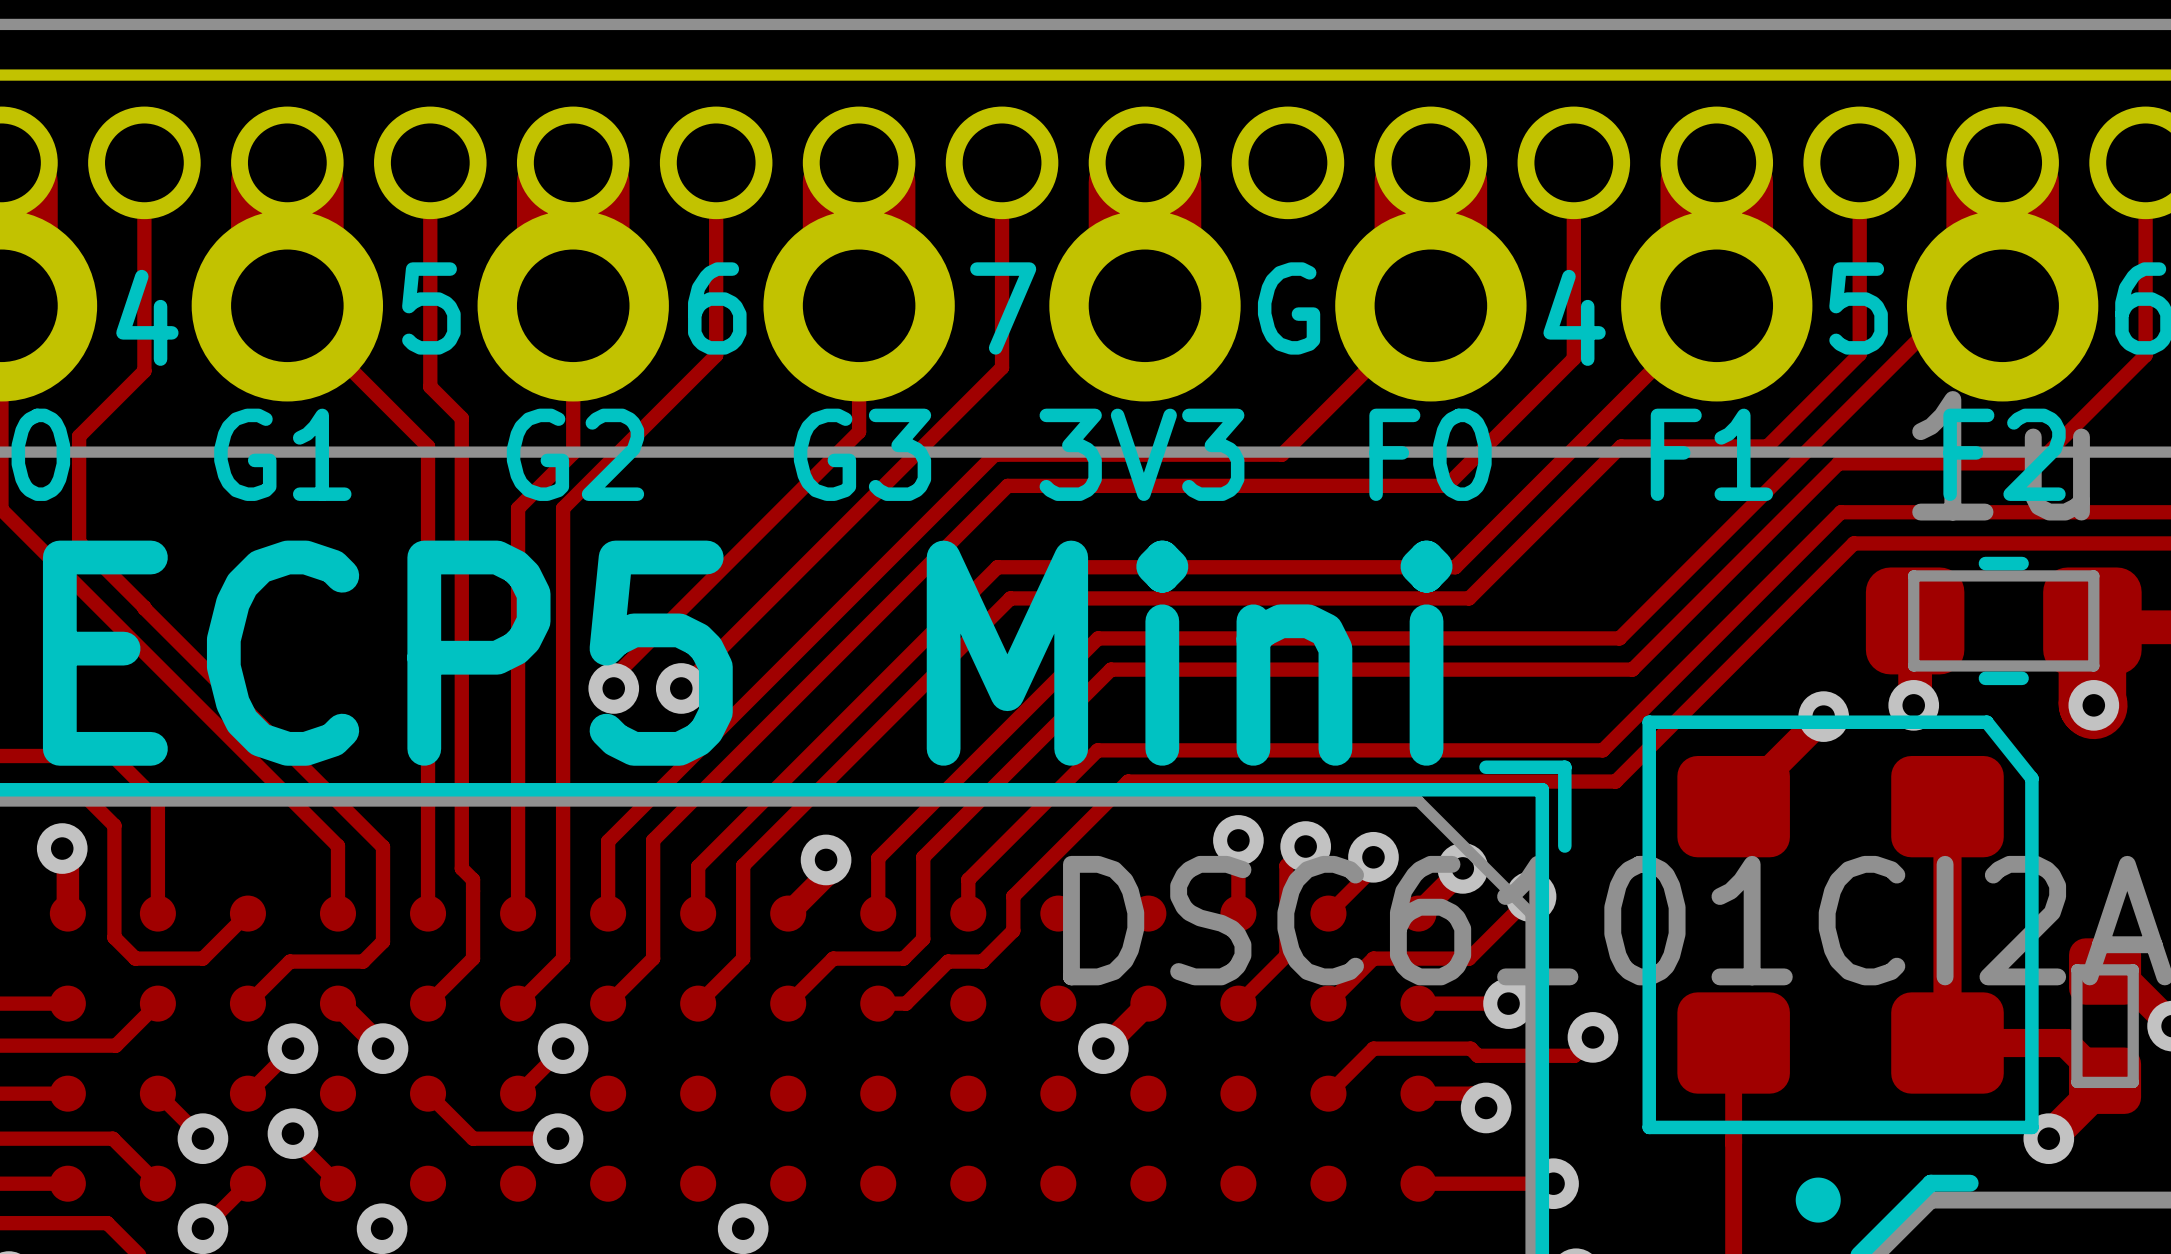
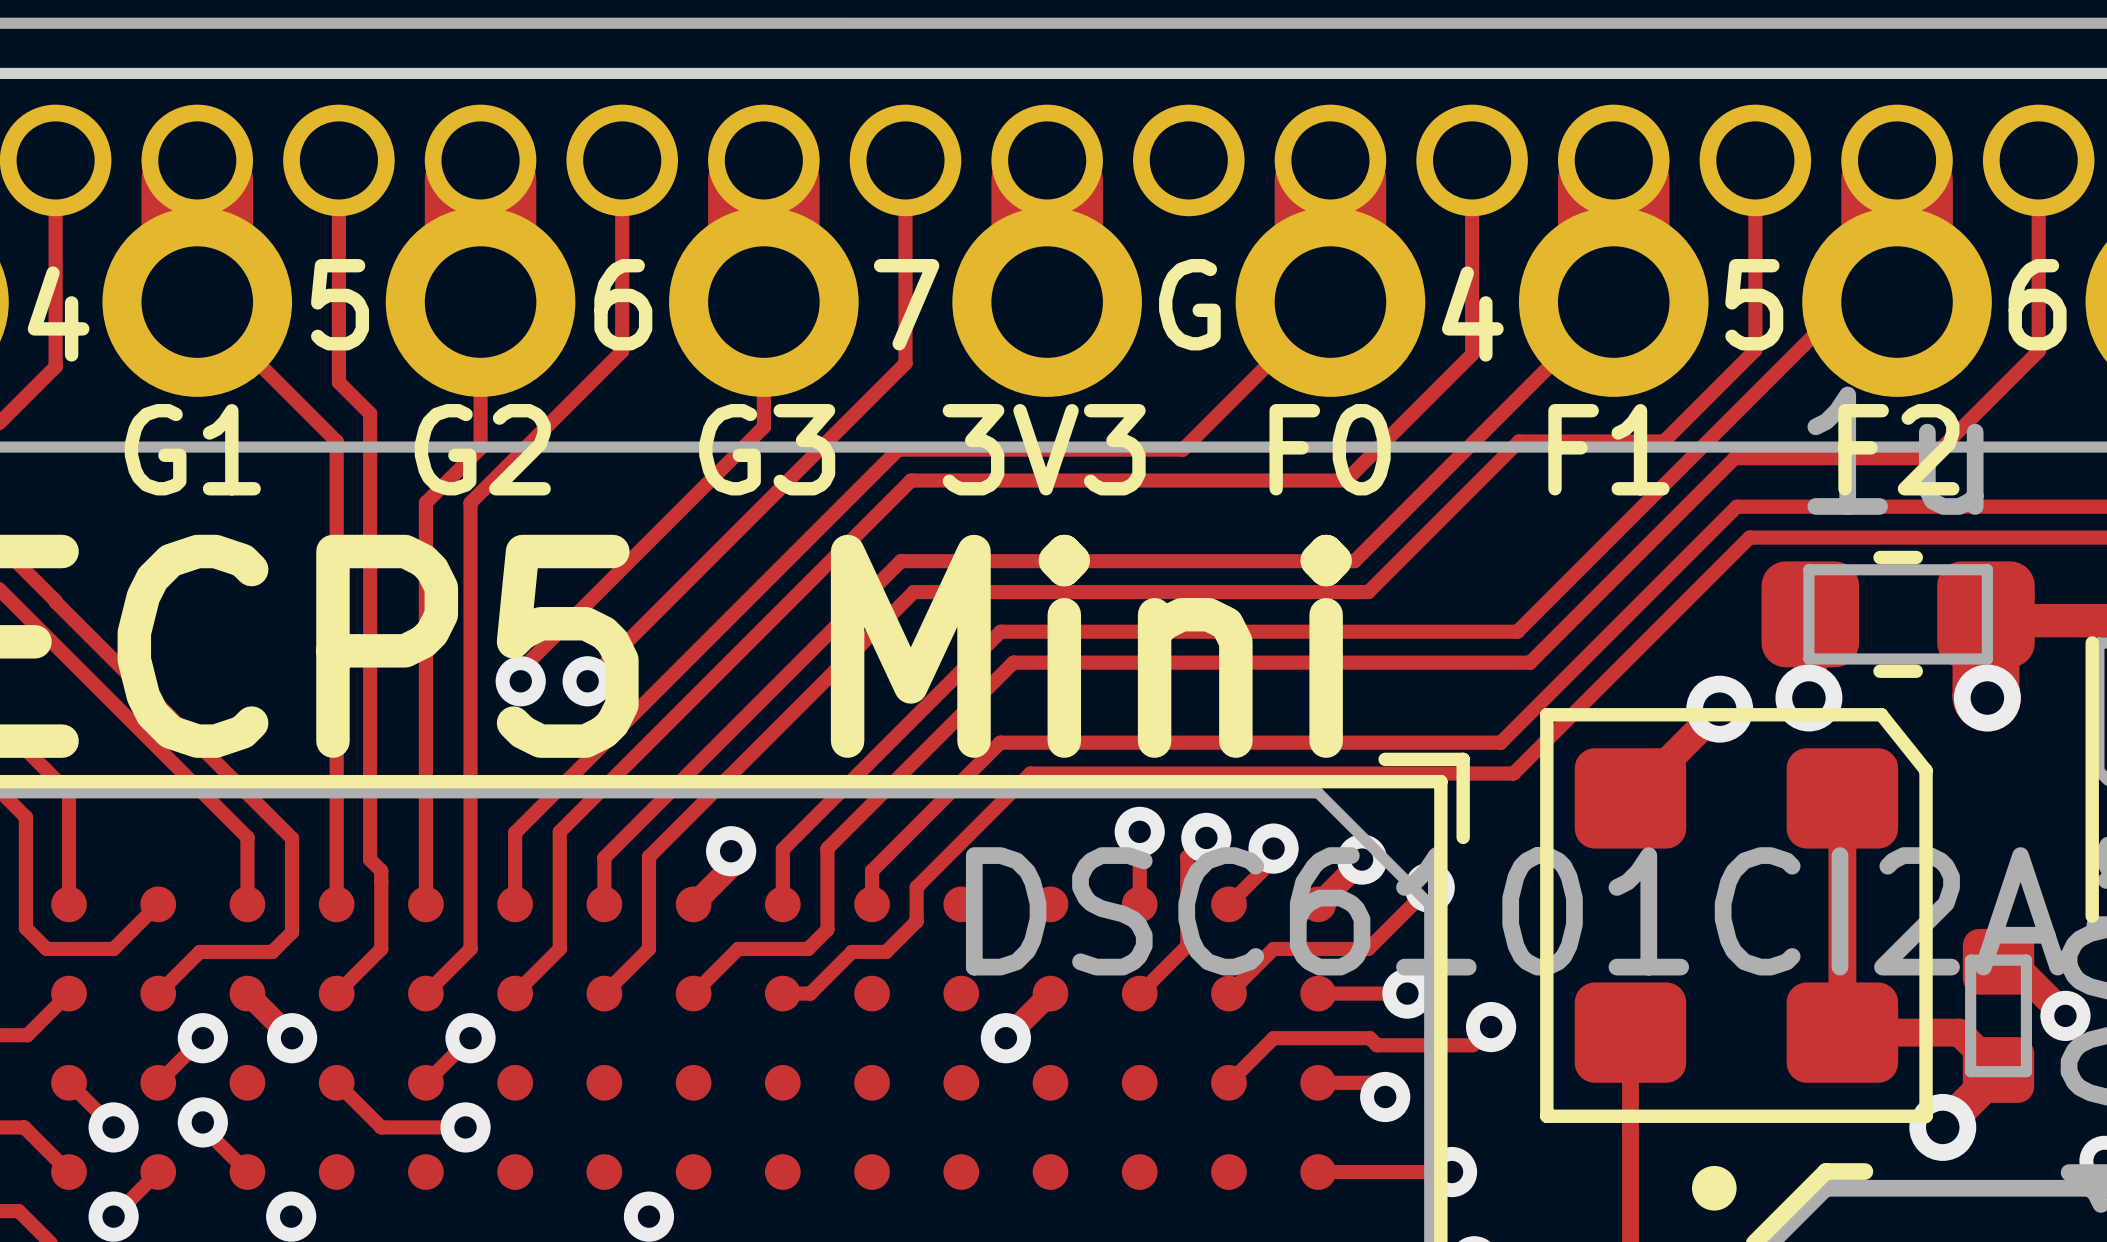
via size: [1888, 680, 1940, 731] -> [1775, 664, 1843, 732]
via size: [2068, 680, 2120, 731] -> [1953, 664, 2021, 732]
via size: [1798, 691, 1850, 742] -> [1686, 675, 1754, 743]
via size: [2023, 1113, 2075, 1165] -> [1909, 1093, 1977, 1161]

